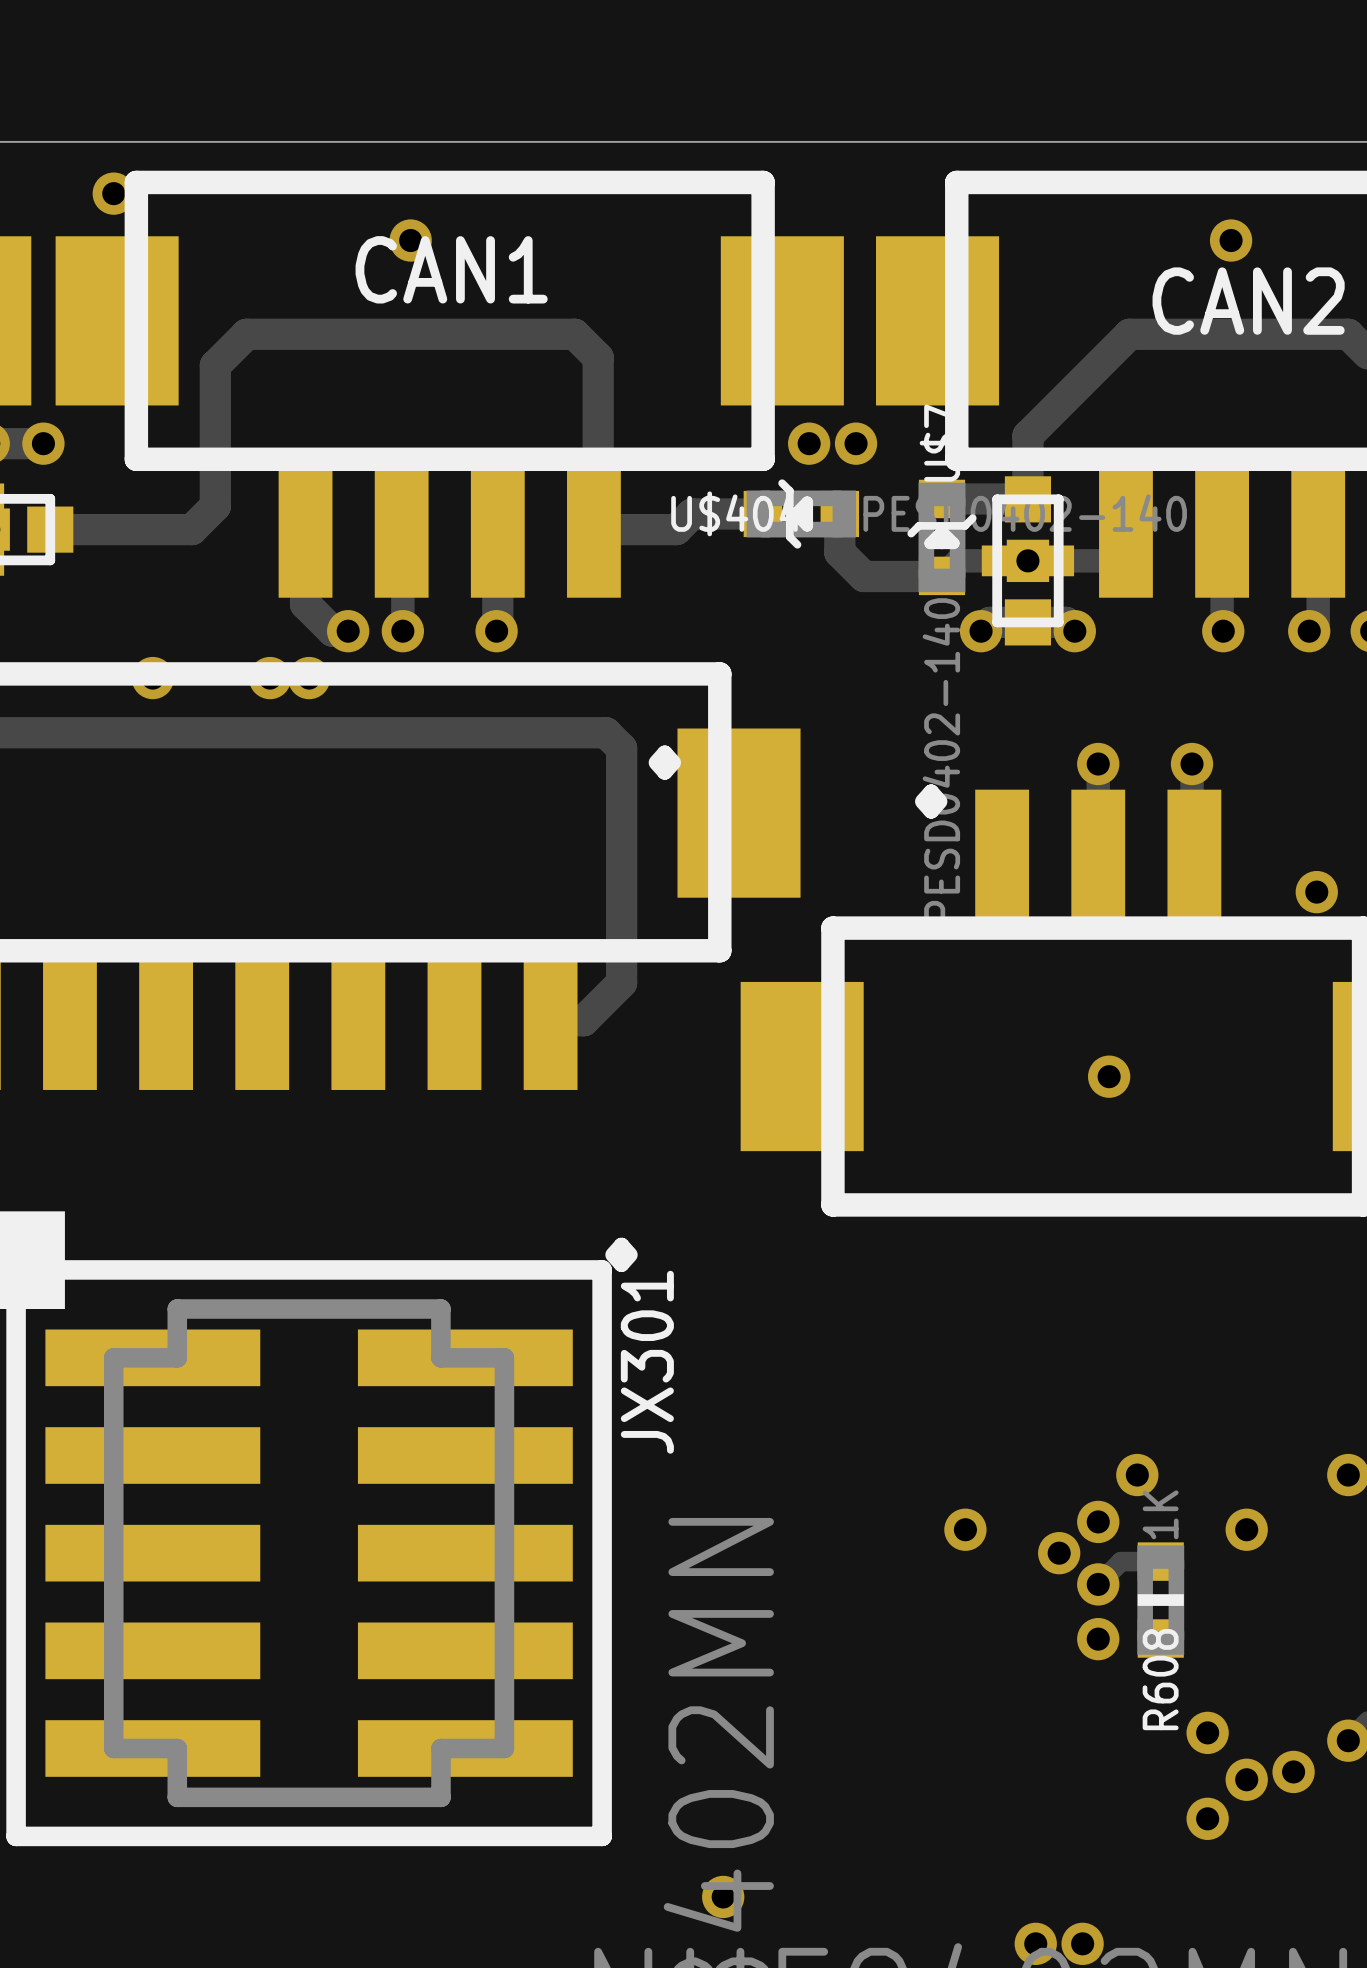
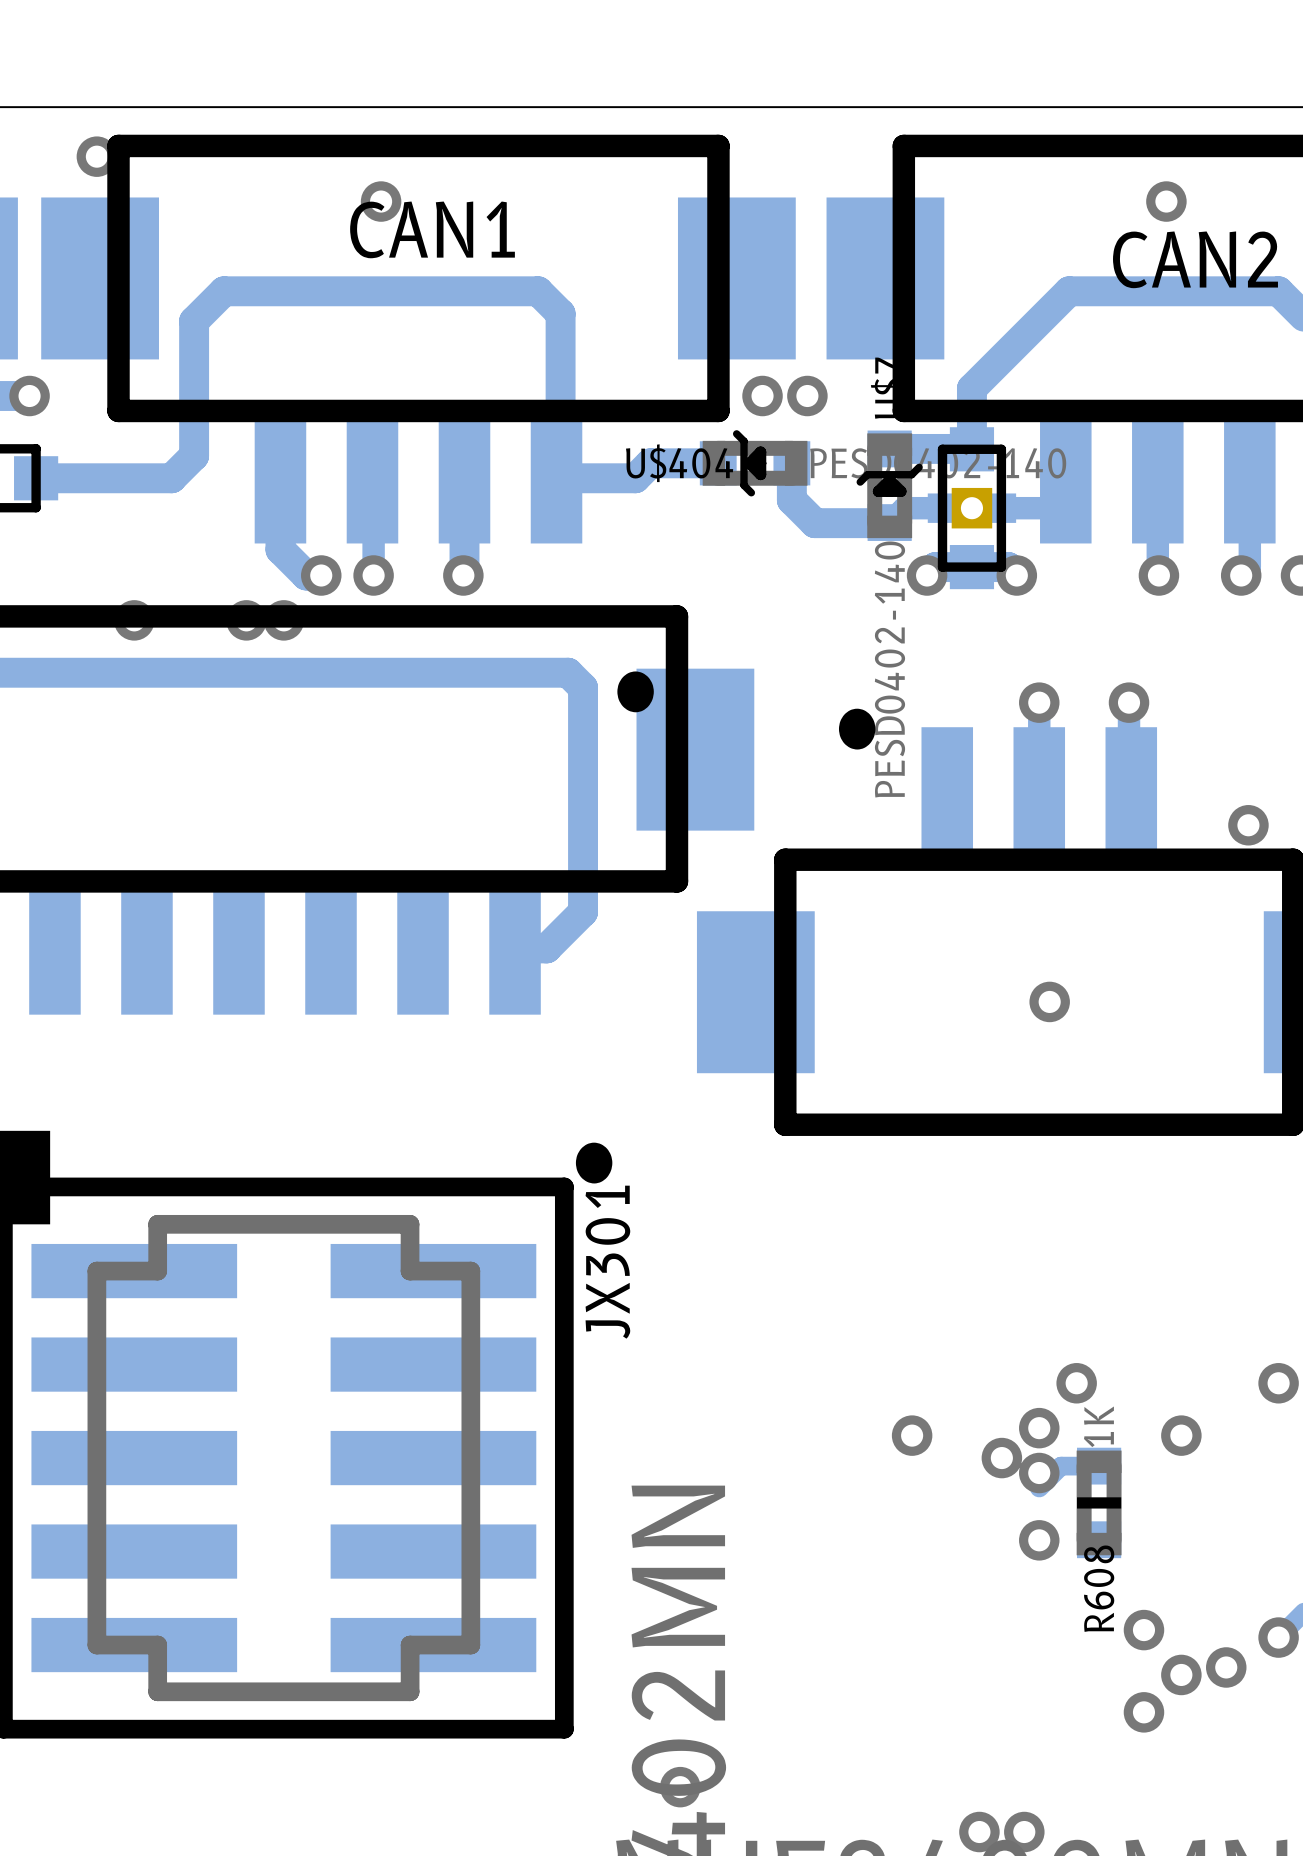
via position: (1098, 1584) -> (1039, 1473)

